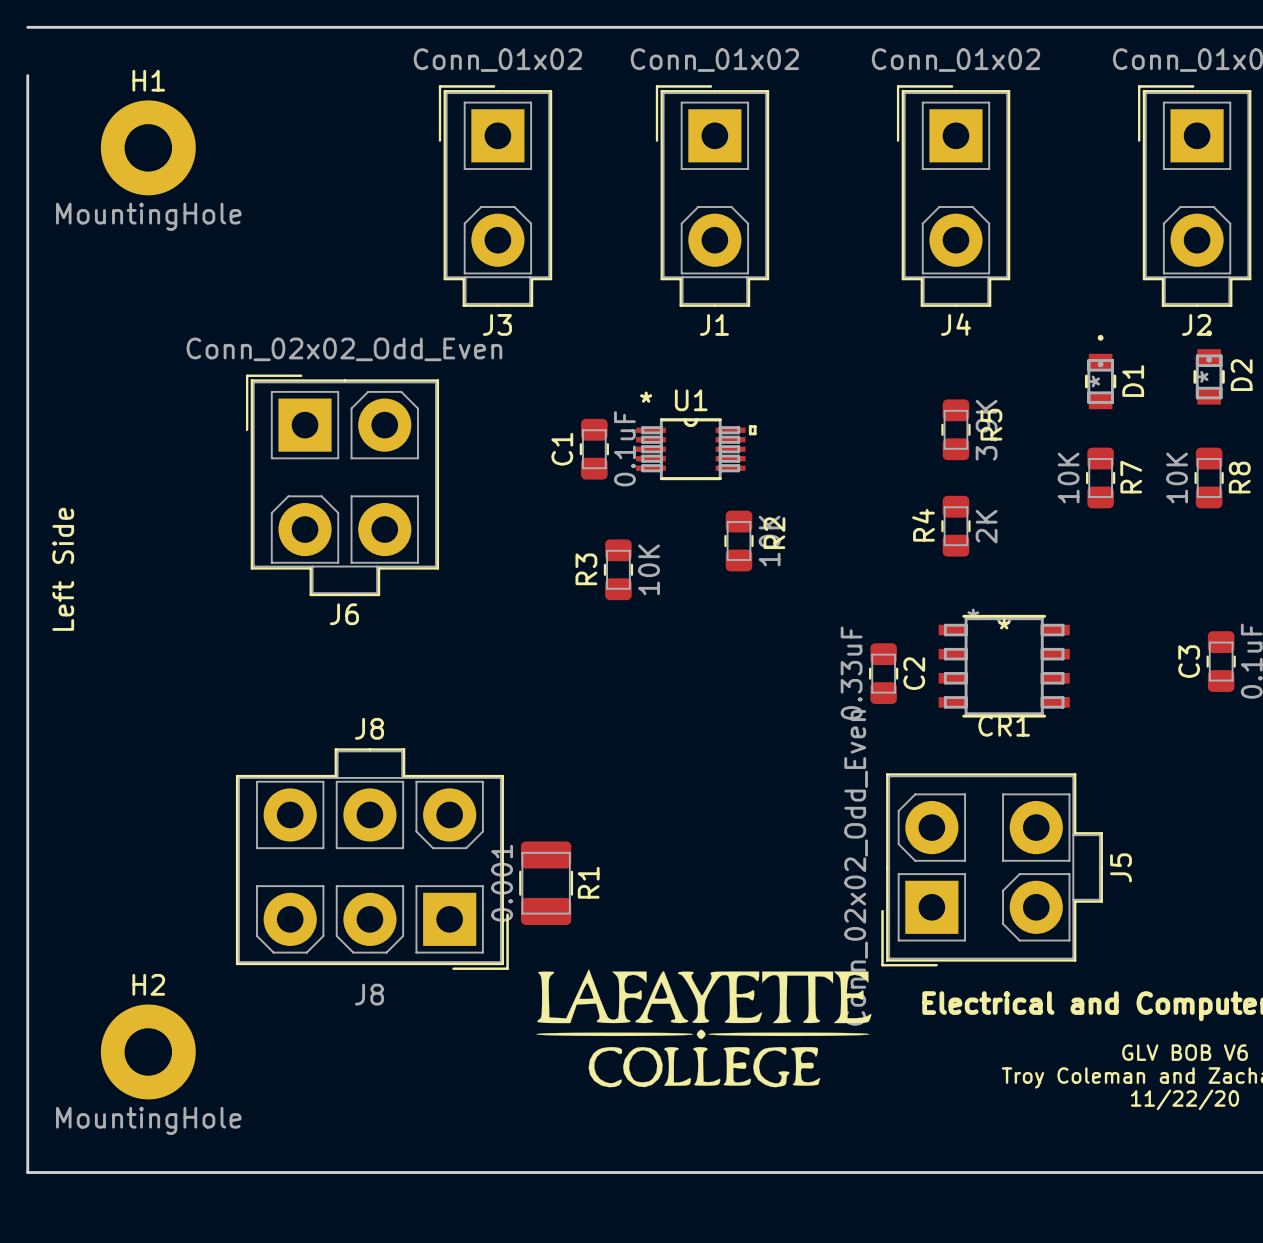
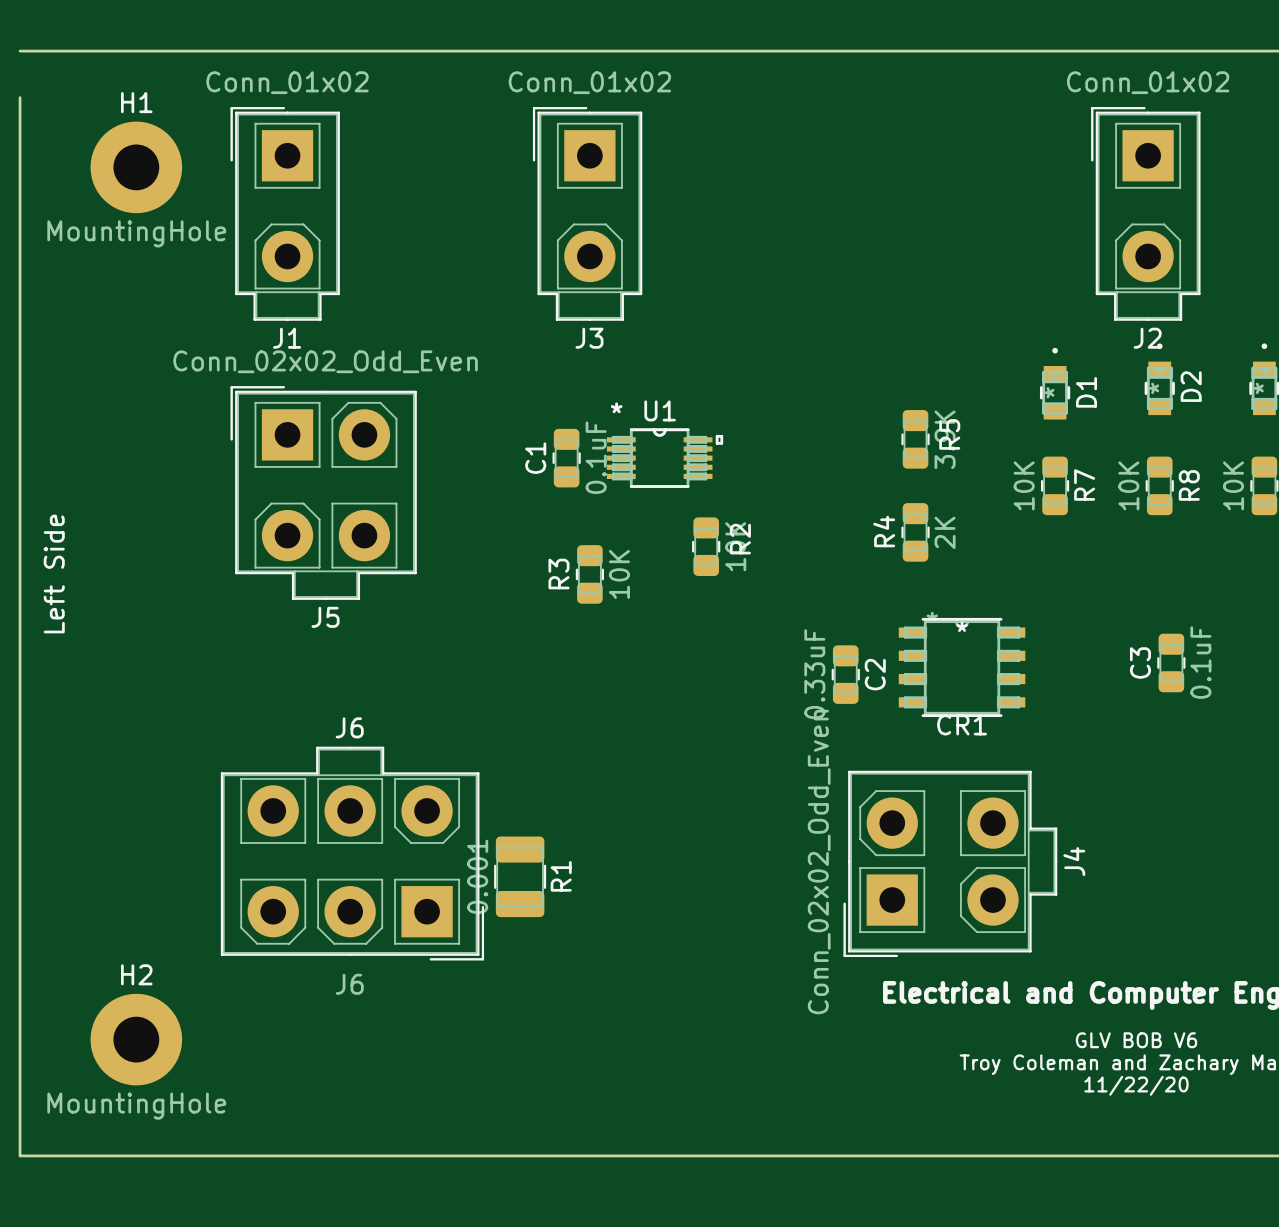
J3 position: (495, 196) -> (587, 213)
J1 position: (712, 196) -> (285, 213)
J4: Conn_01x02 (953, 196) -> none
J6 name: J6 (344, 614) -> J5 (325, 617)
J8 name: J8 (369, 728) -> J6 (349, 727)
J5 name: J5 (1120, 867) -> J4 (1074, 861)
drawing: [536, 969, 872, 1088] -> none
J8 value: J8 (369, 994) -> J6 (349, 984)

